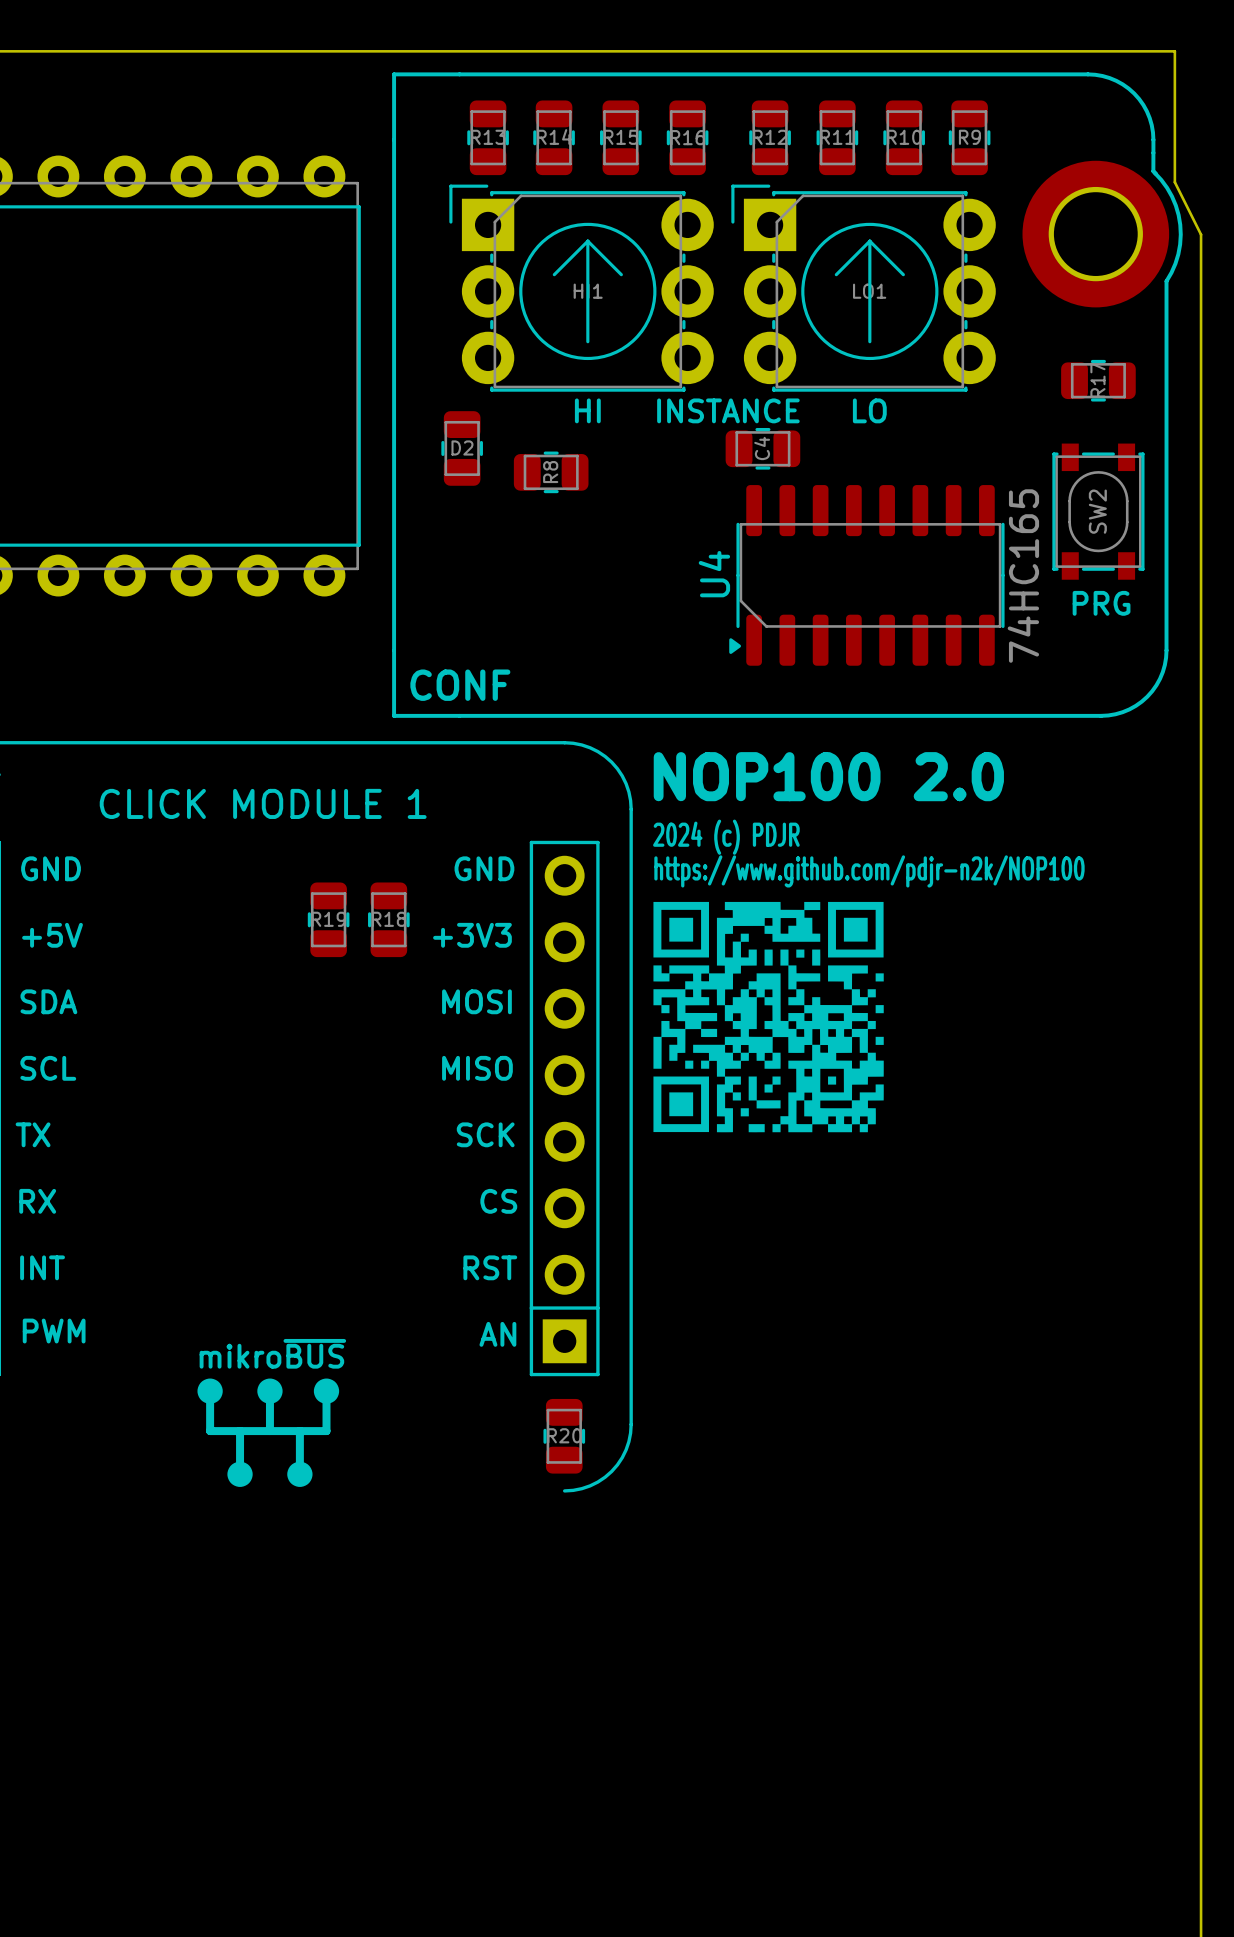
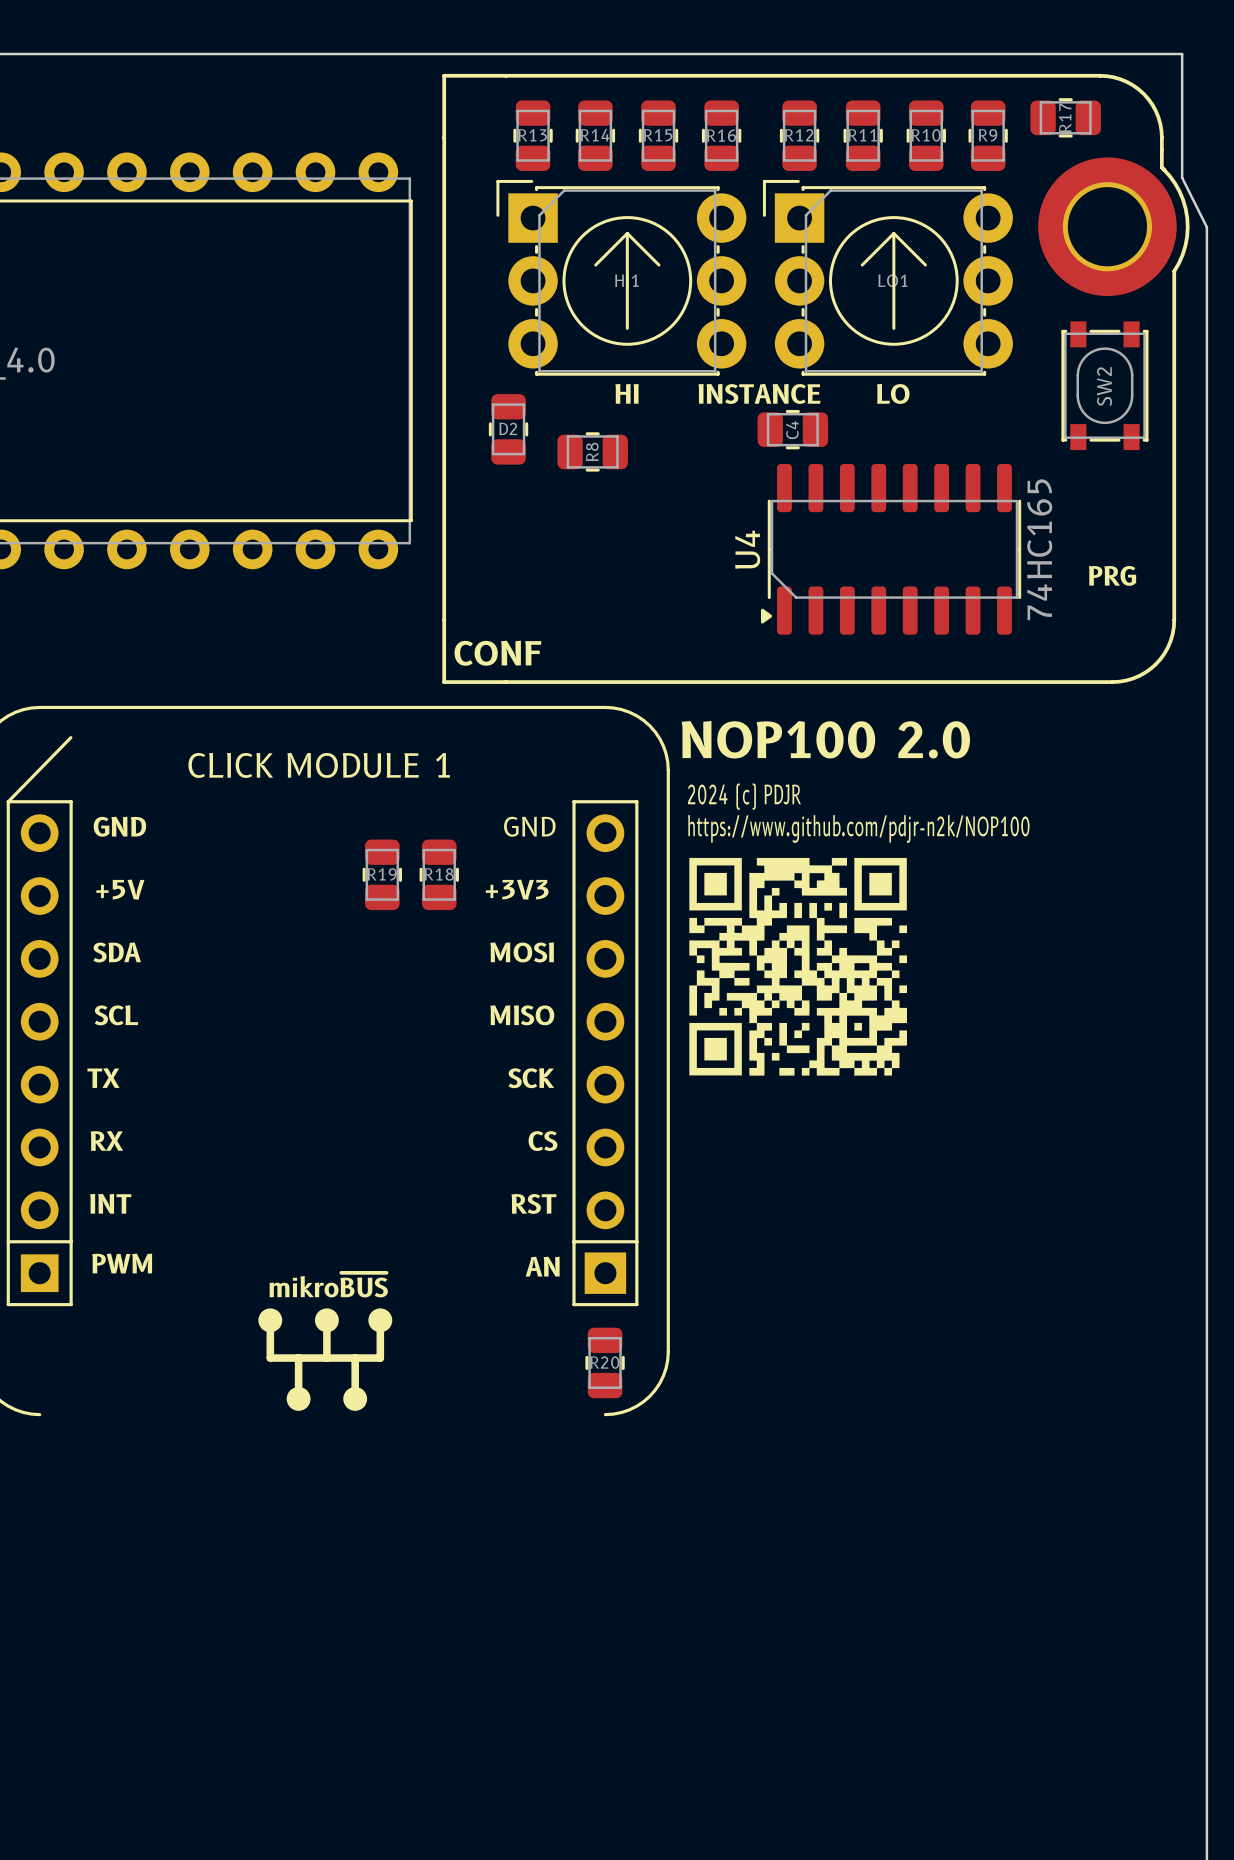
R17 position: (1098, 380) -> (1065, 117)
SW2 position: (1098, 511) -> (1104, 385)

